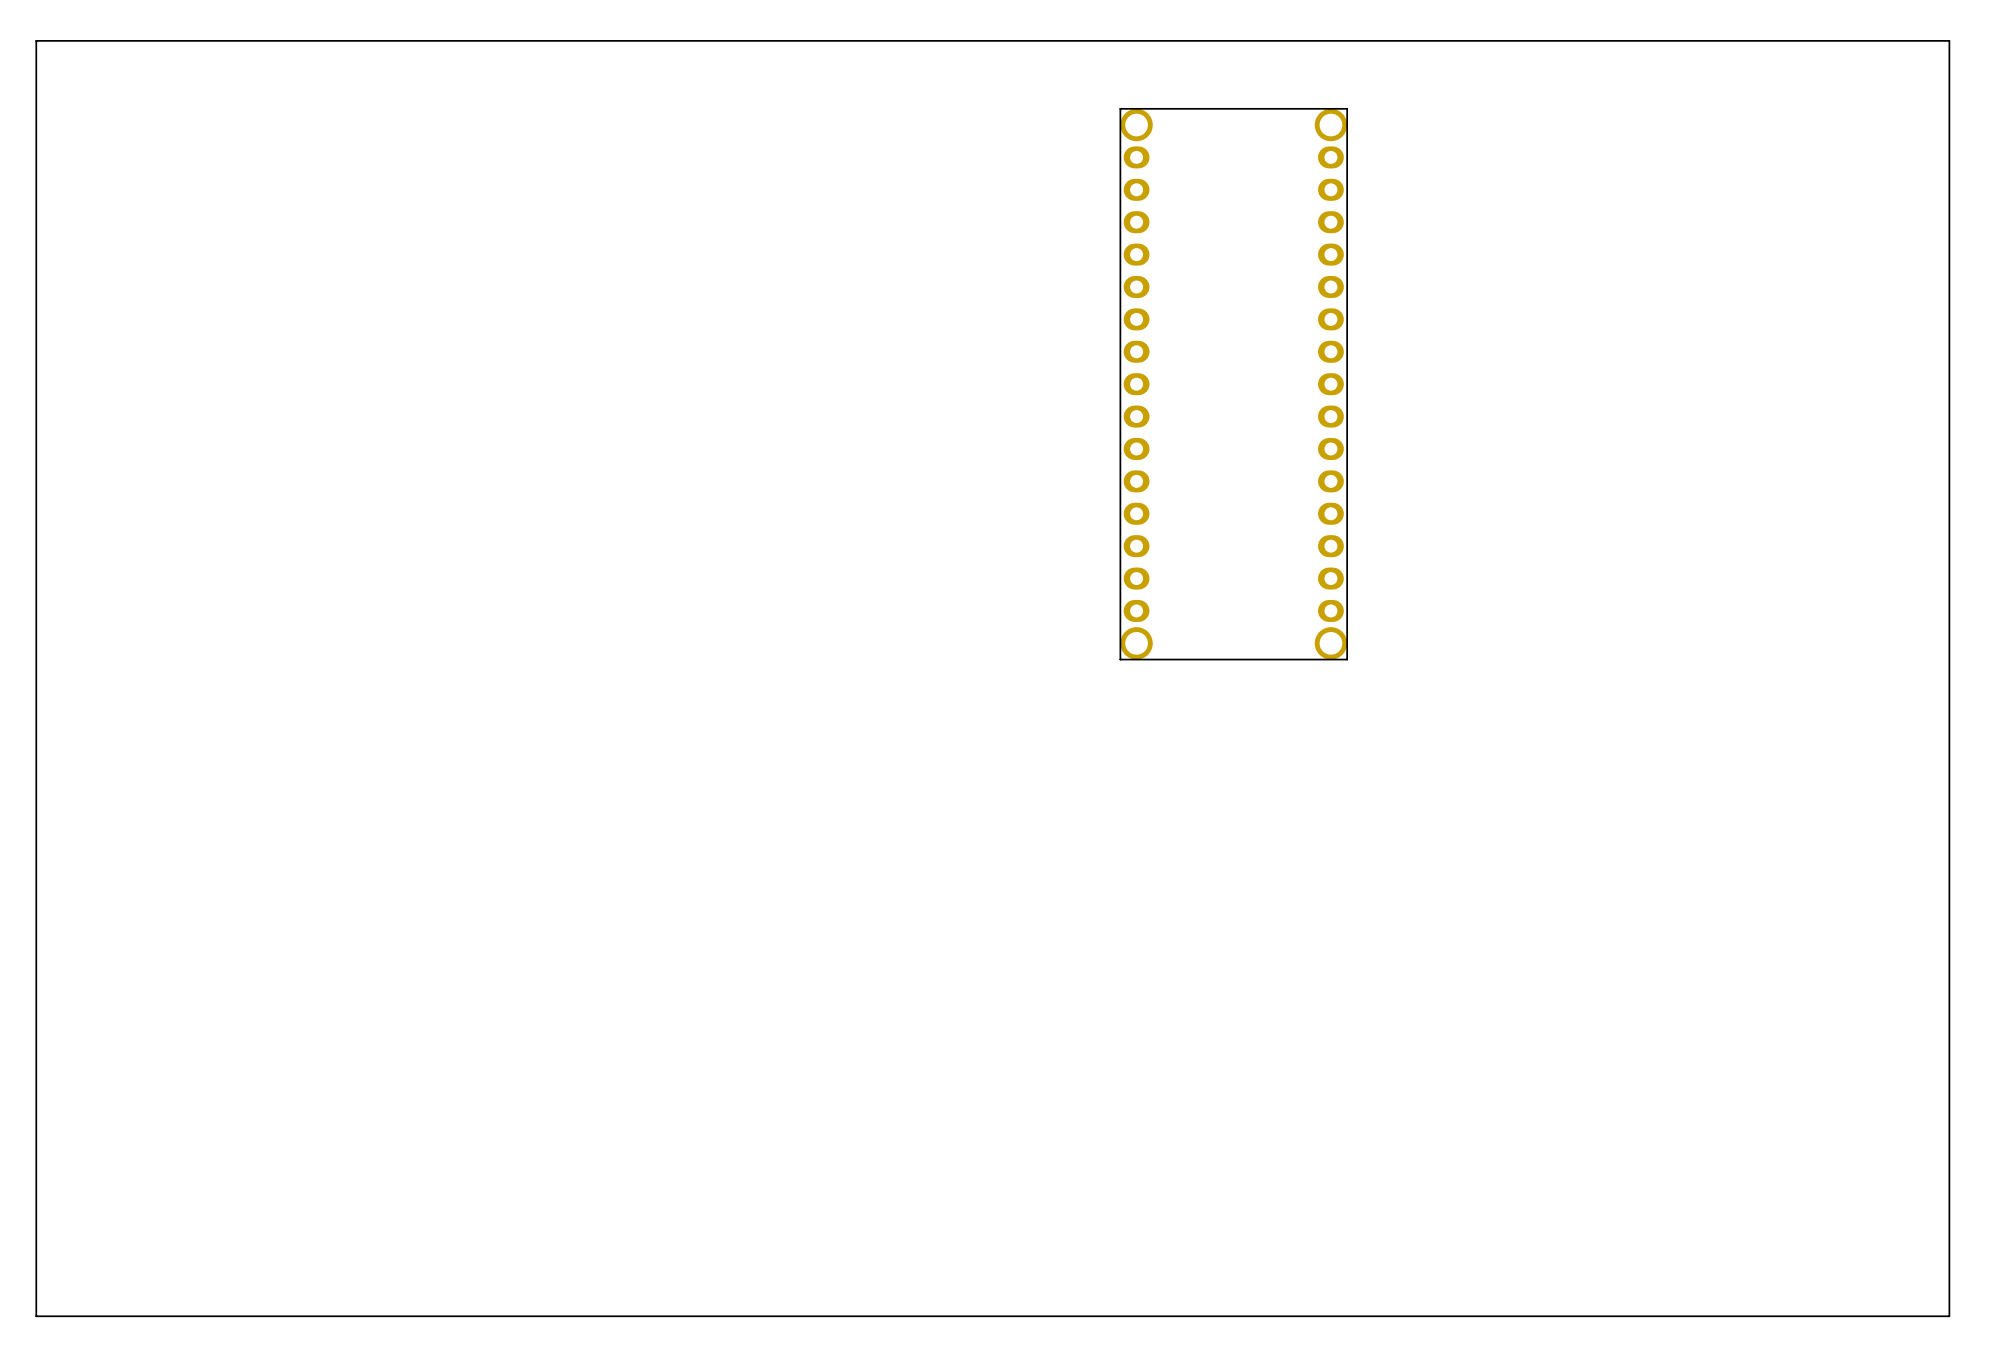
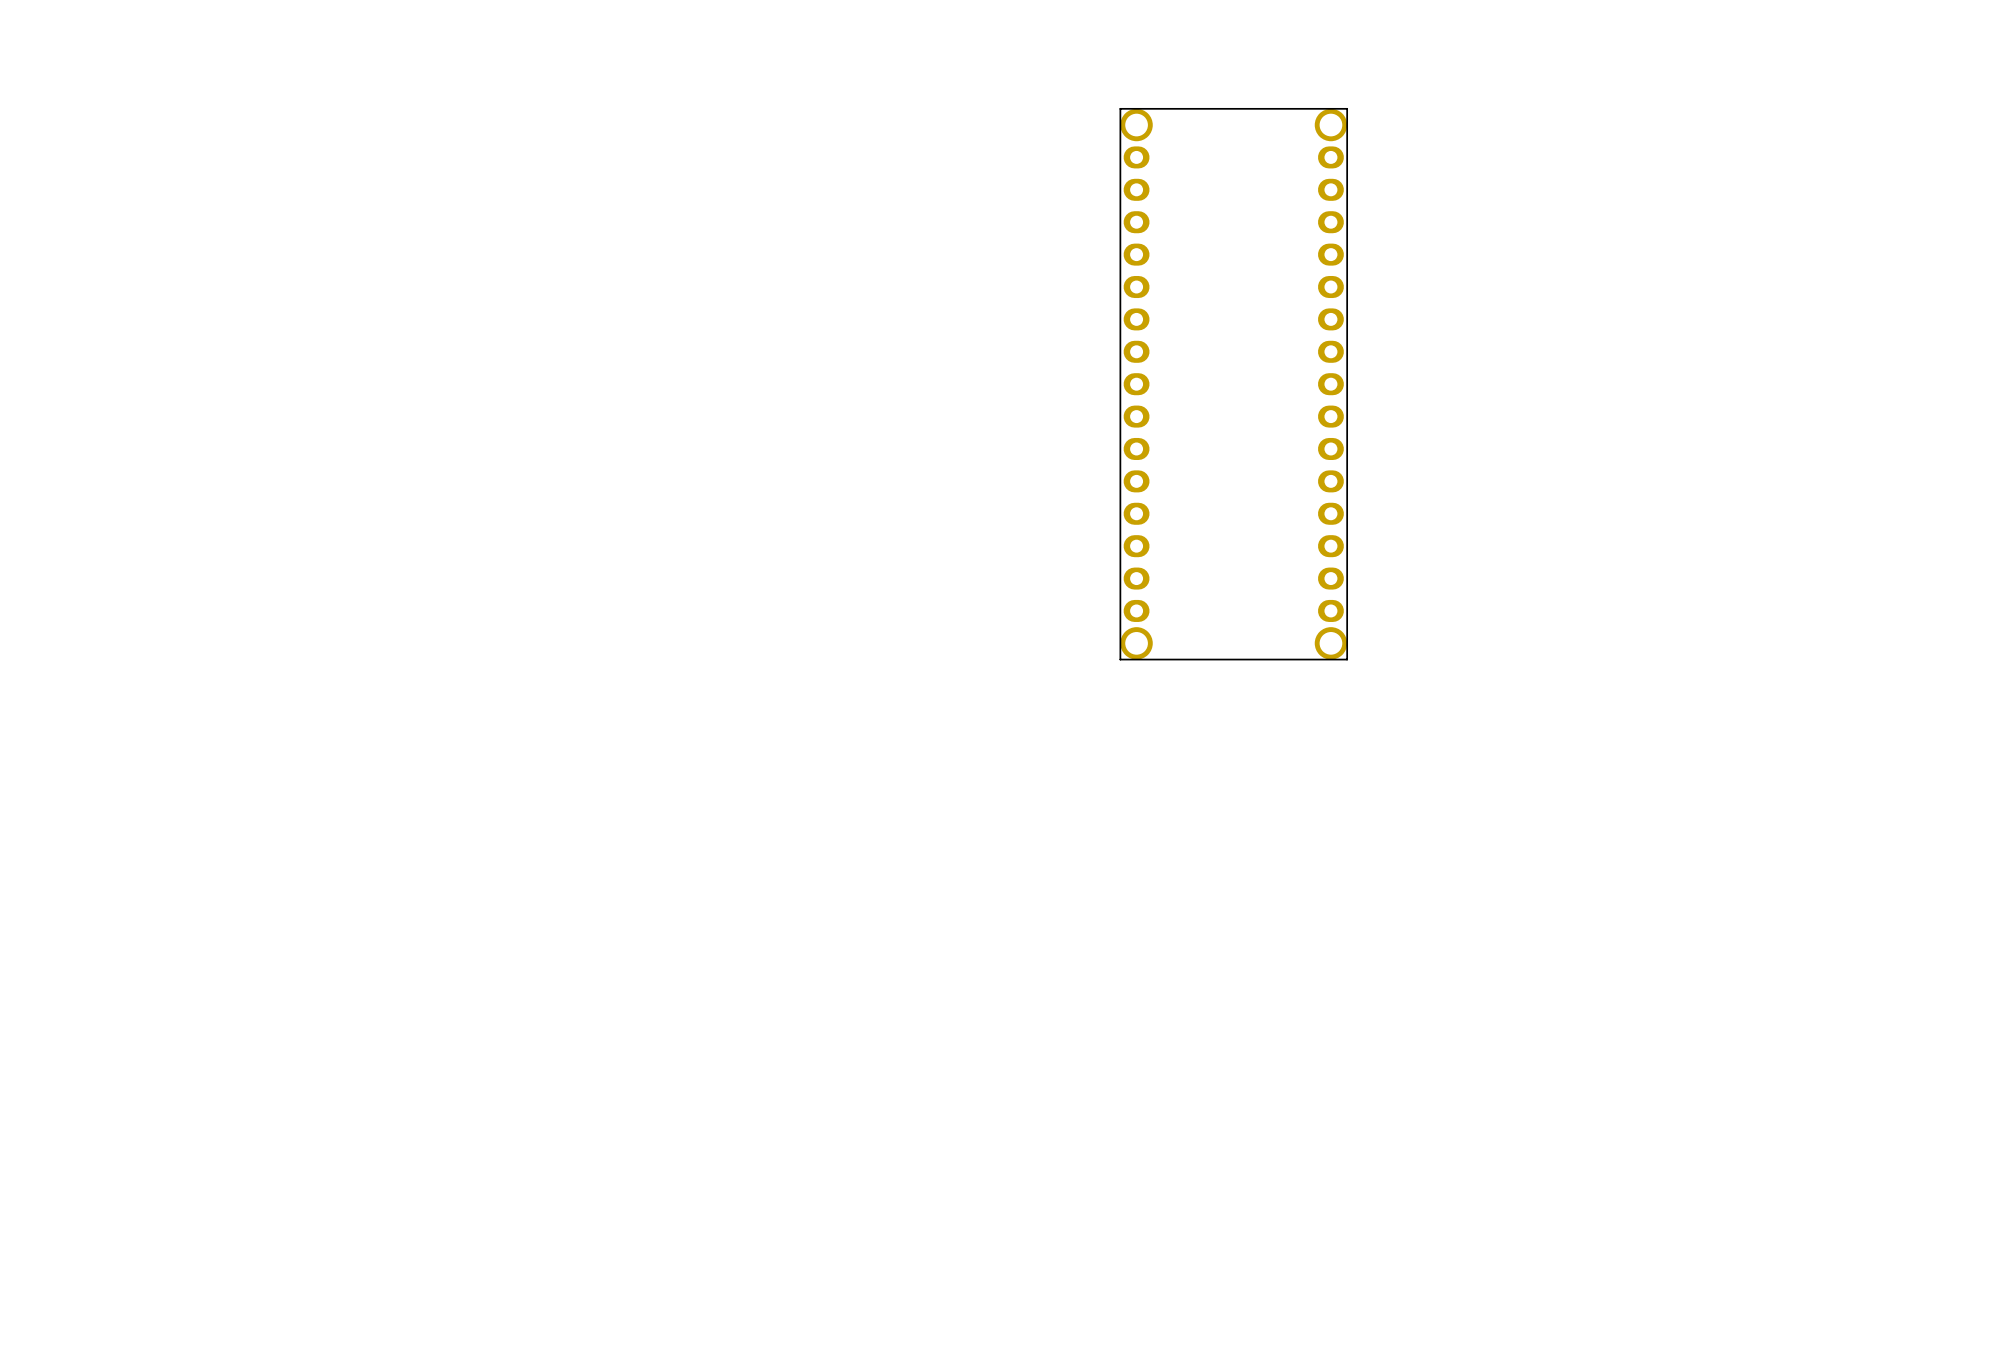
board edge: (1949, 40) (1949, 1316) (36, 1316) (36, 40) (1949, 40) -> none

